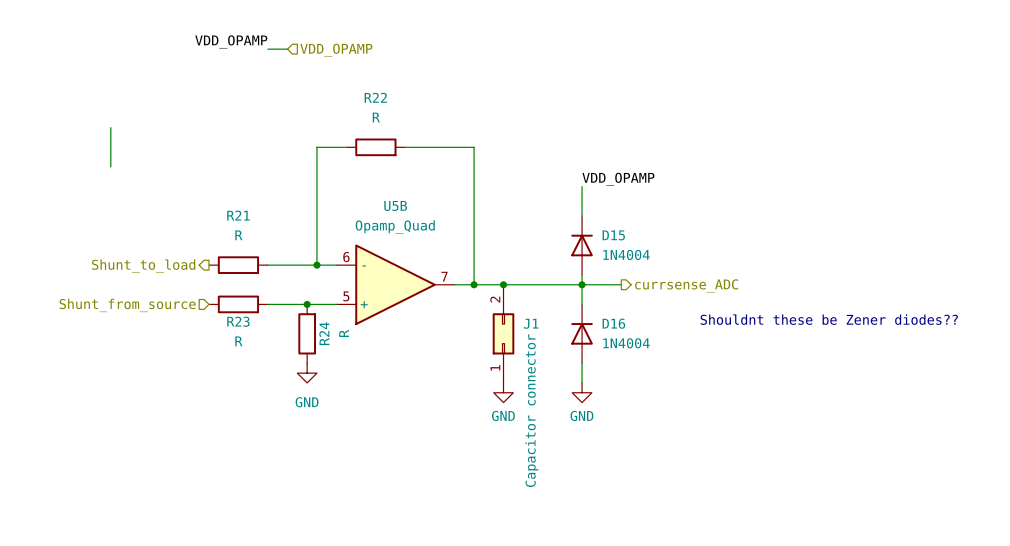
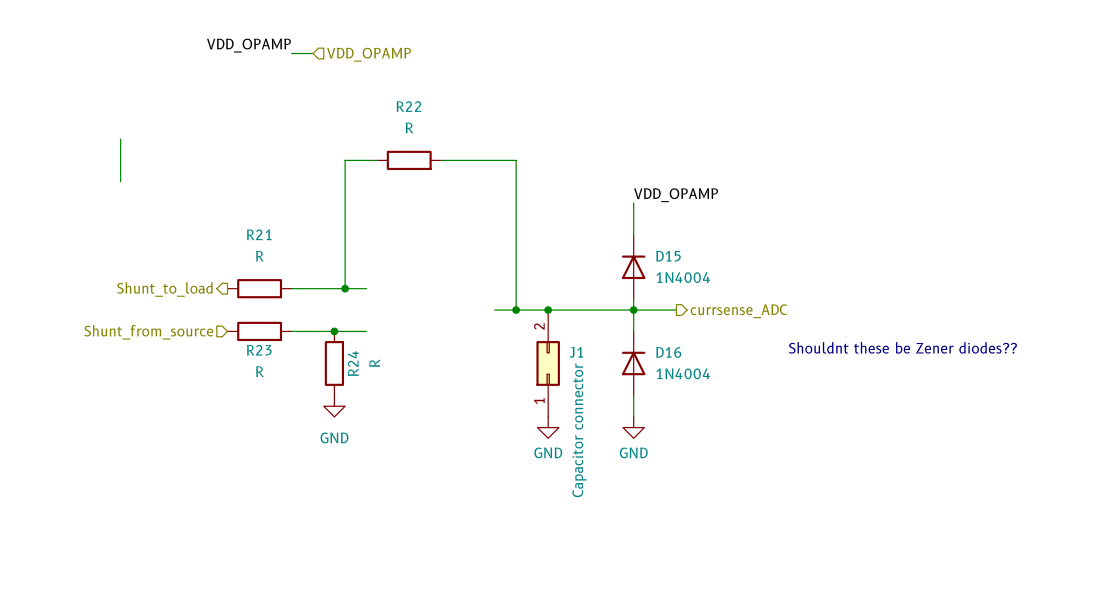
U5B: Opamp_Quad (395, 284) -> none

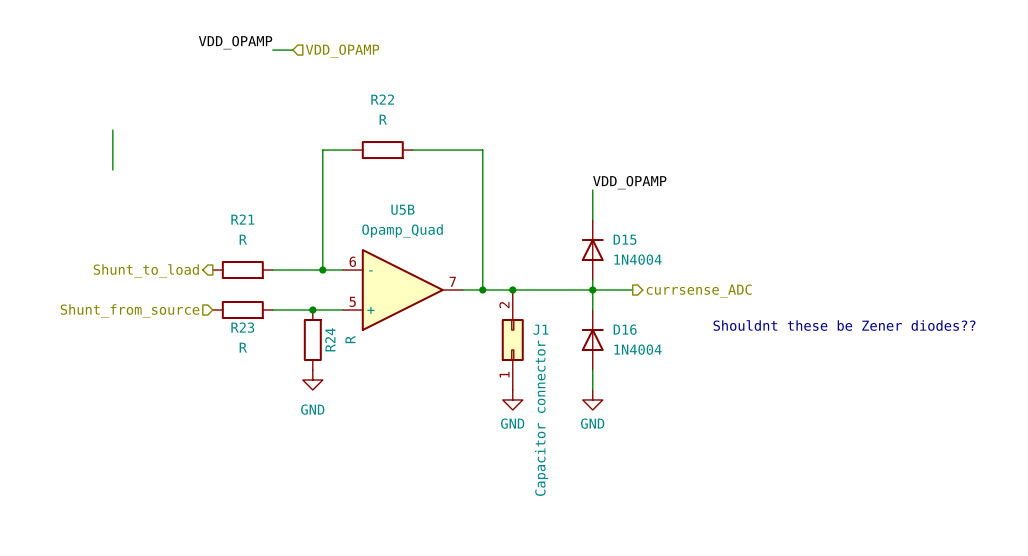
U5B: none -> Opamp_Quad (402, 290)

